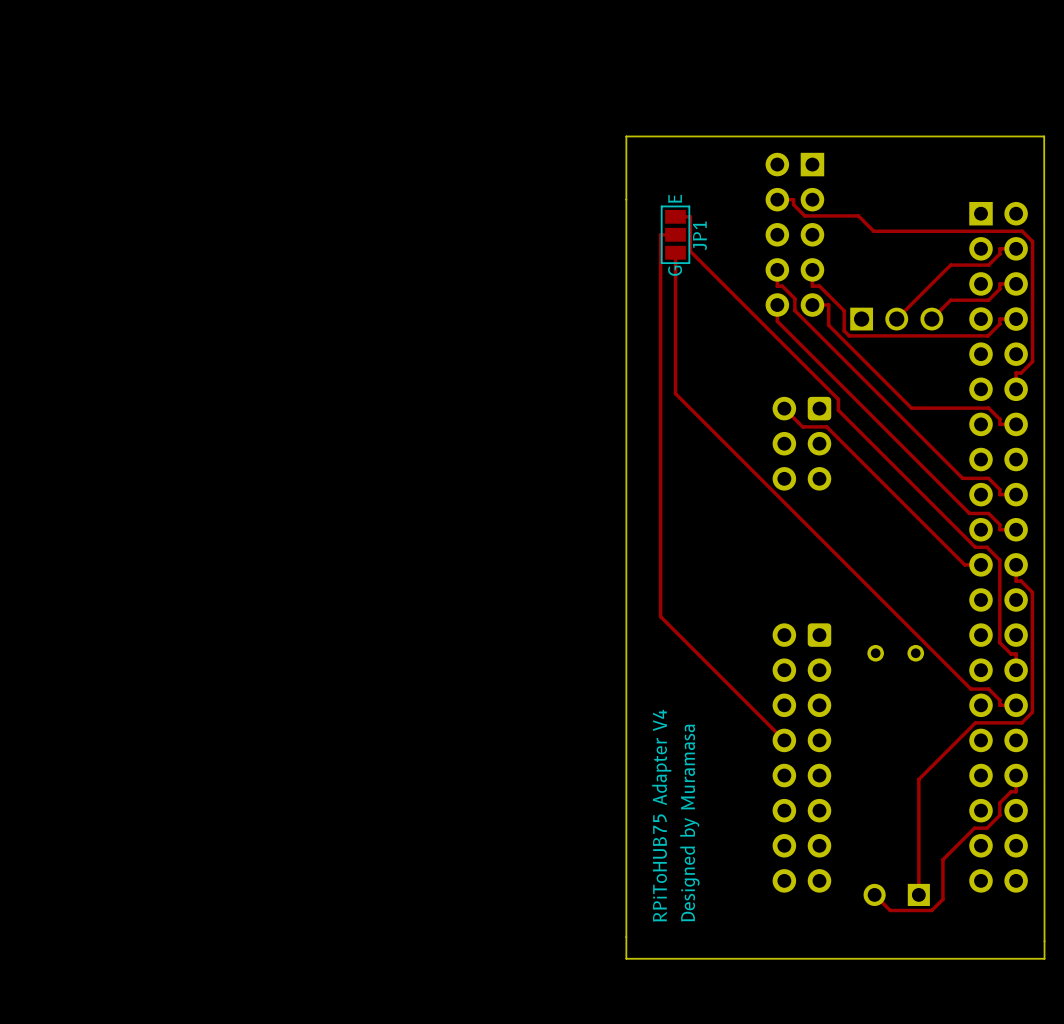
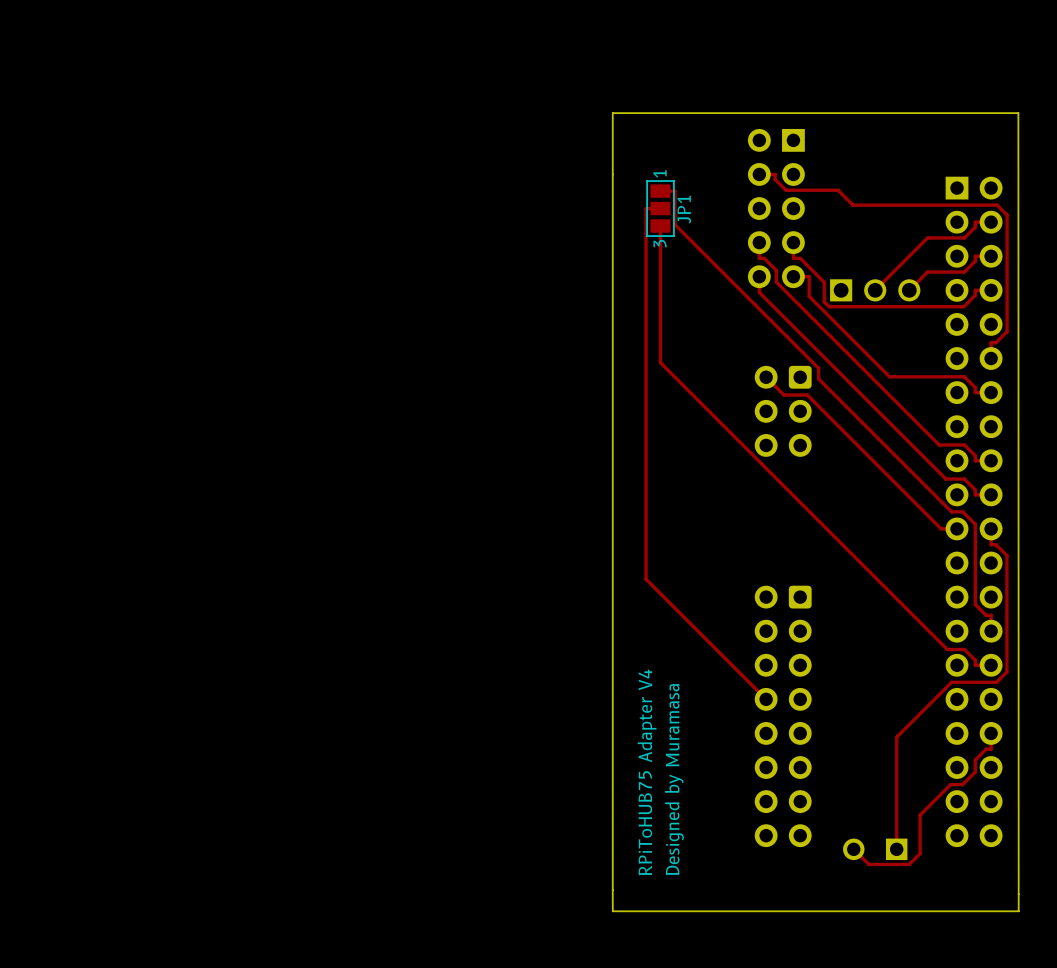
JP1 text: E (675, 198) -> 1 (660, 173)
JP1 text: G (675, 270) -> 3 (660, 243)
part: (895, 653) -> none

